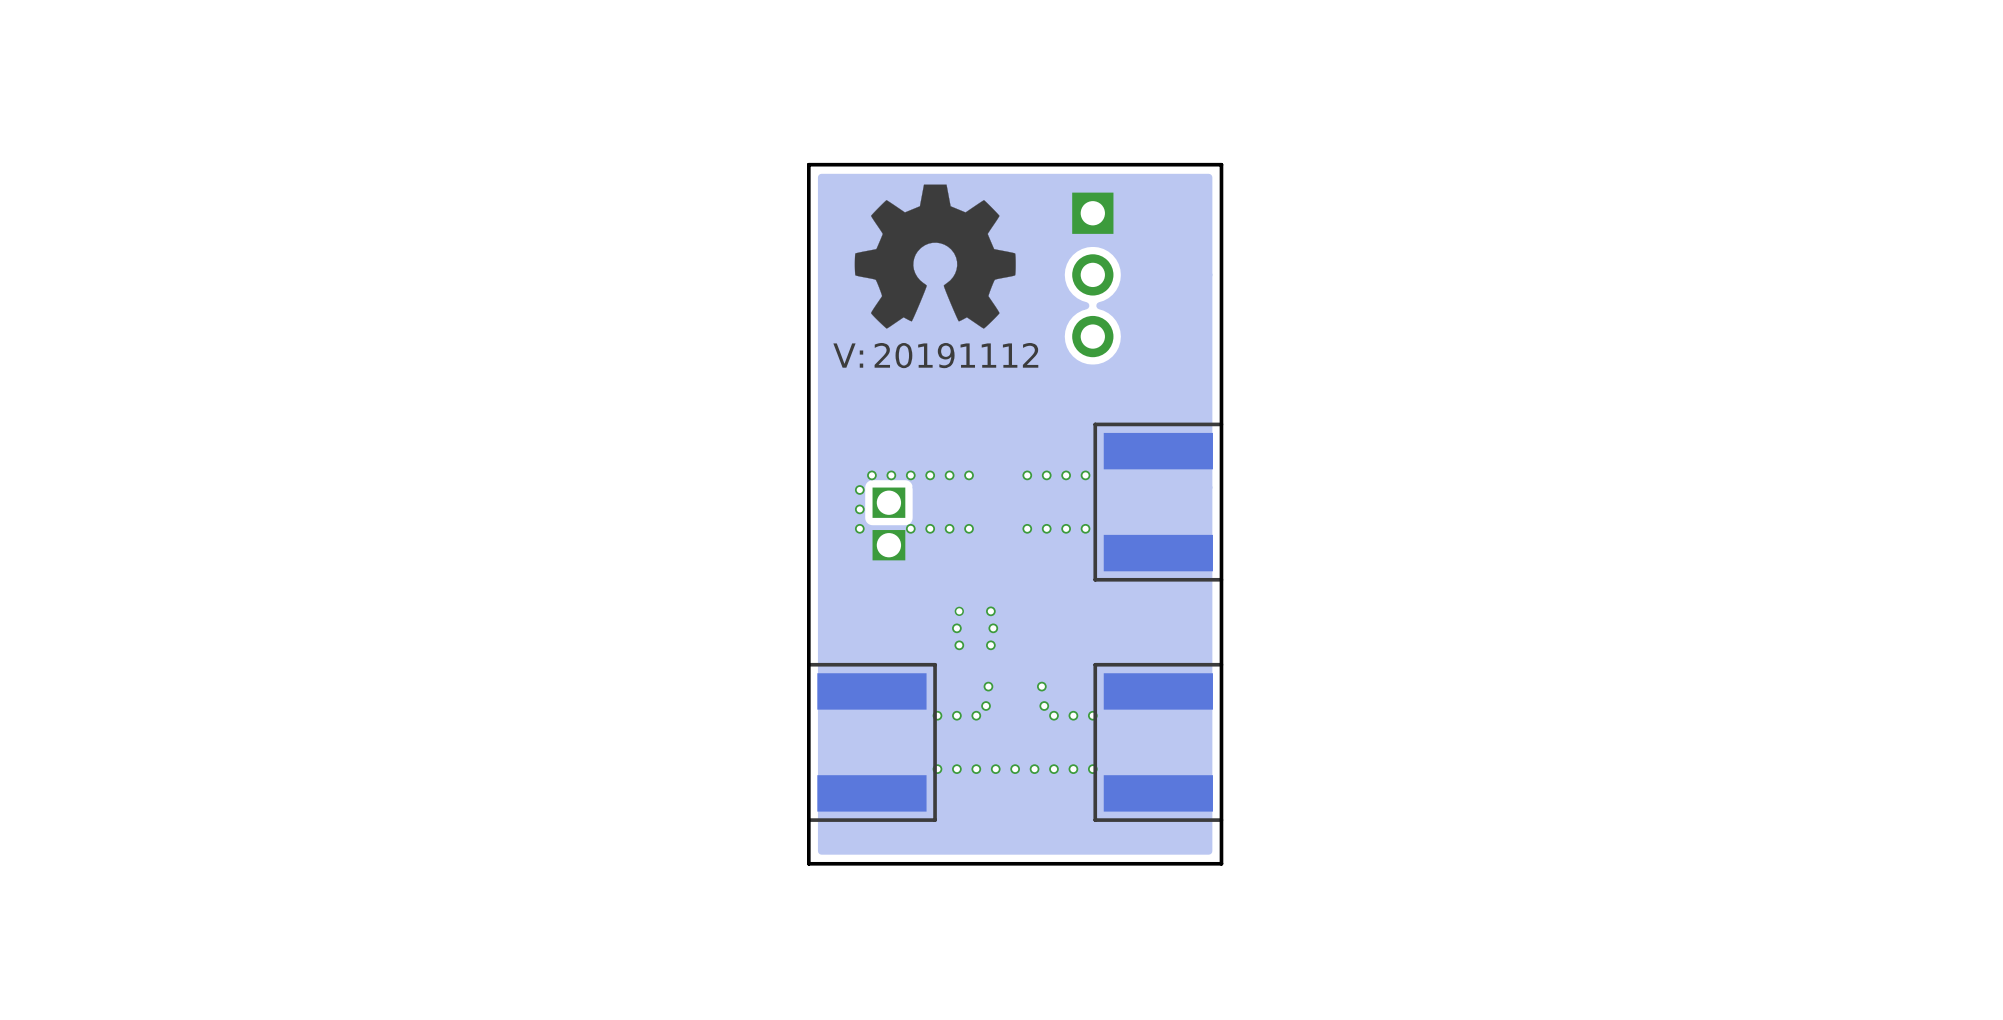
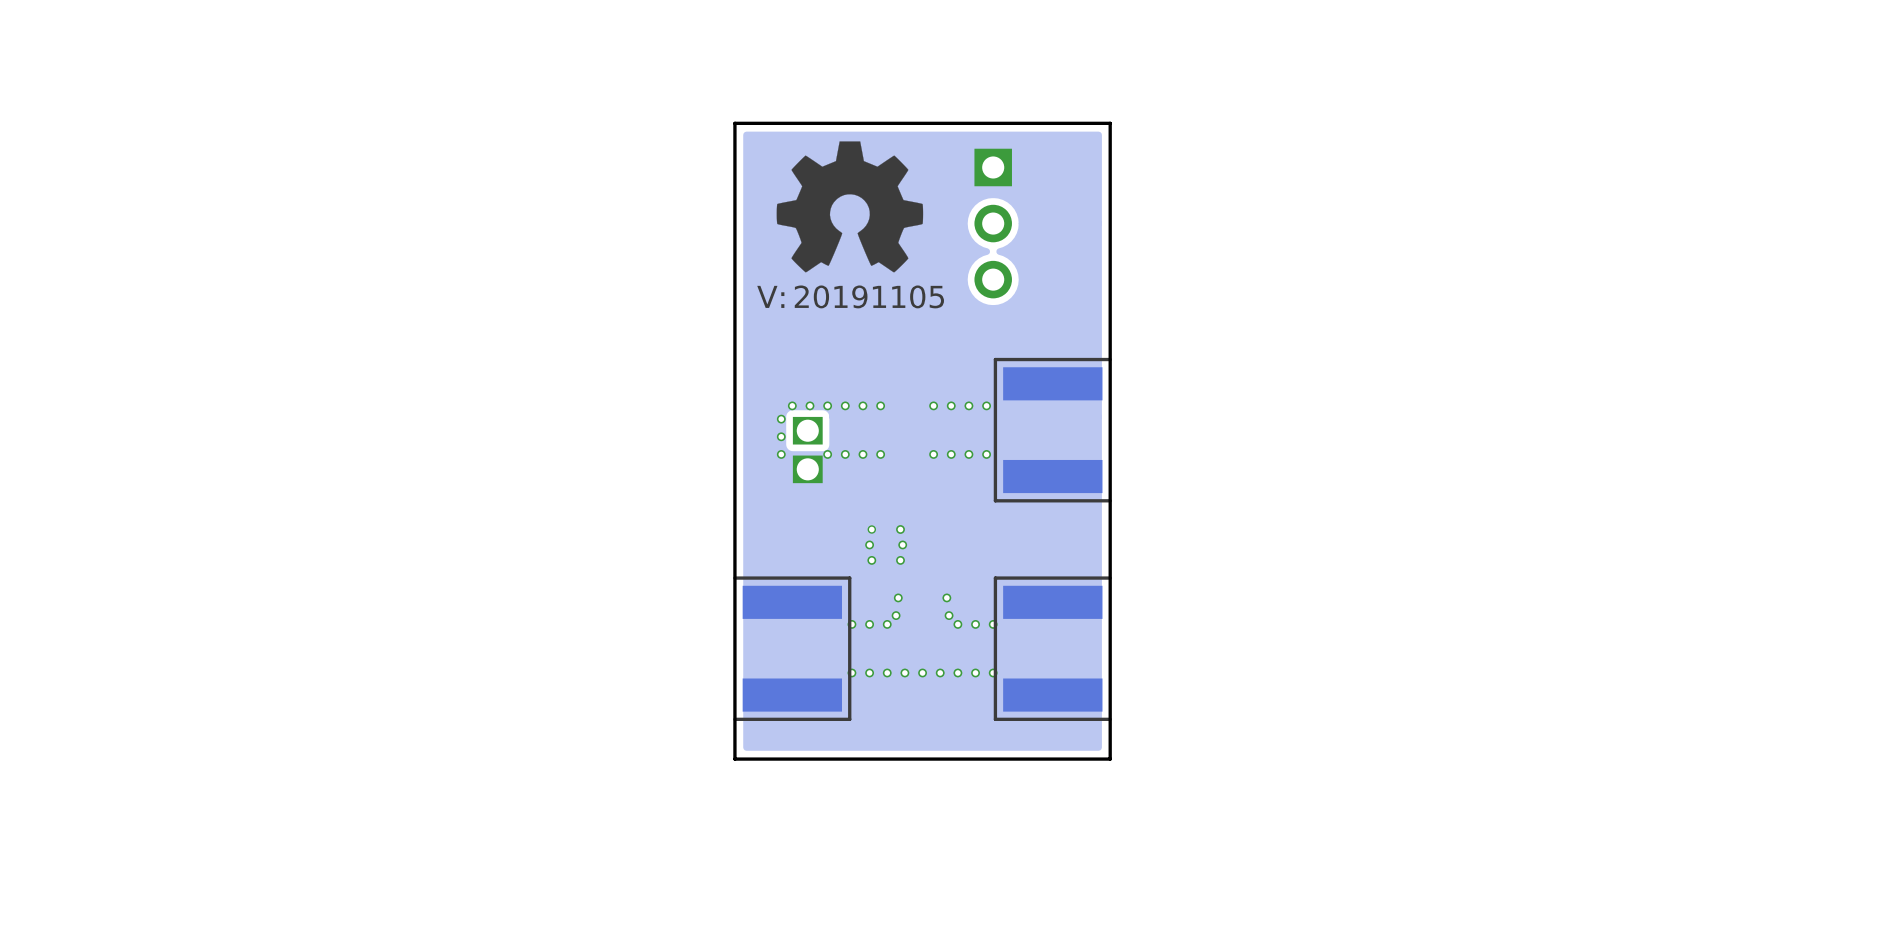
drawing shape: [833, 342, 1039, 369] -> [757, 285, 945, 309]

